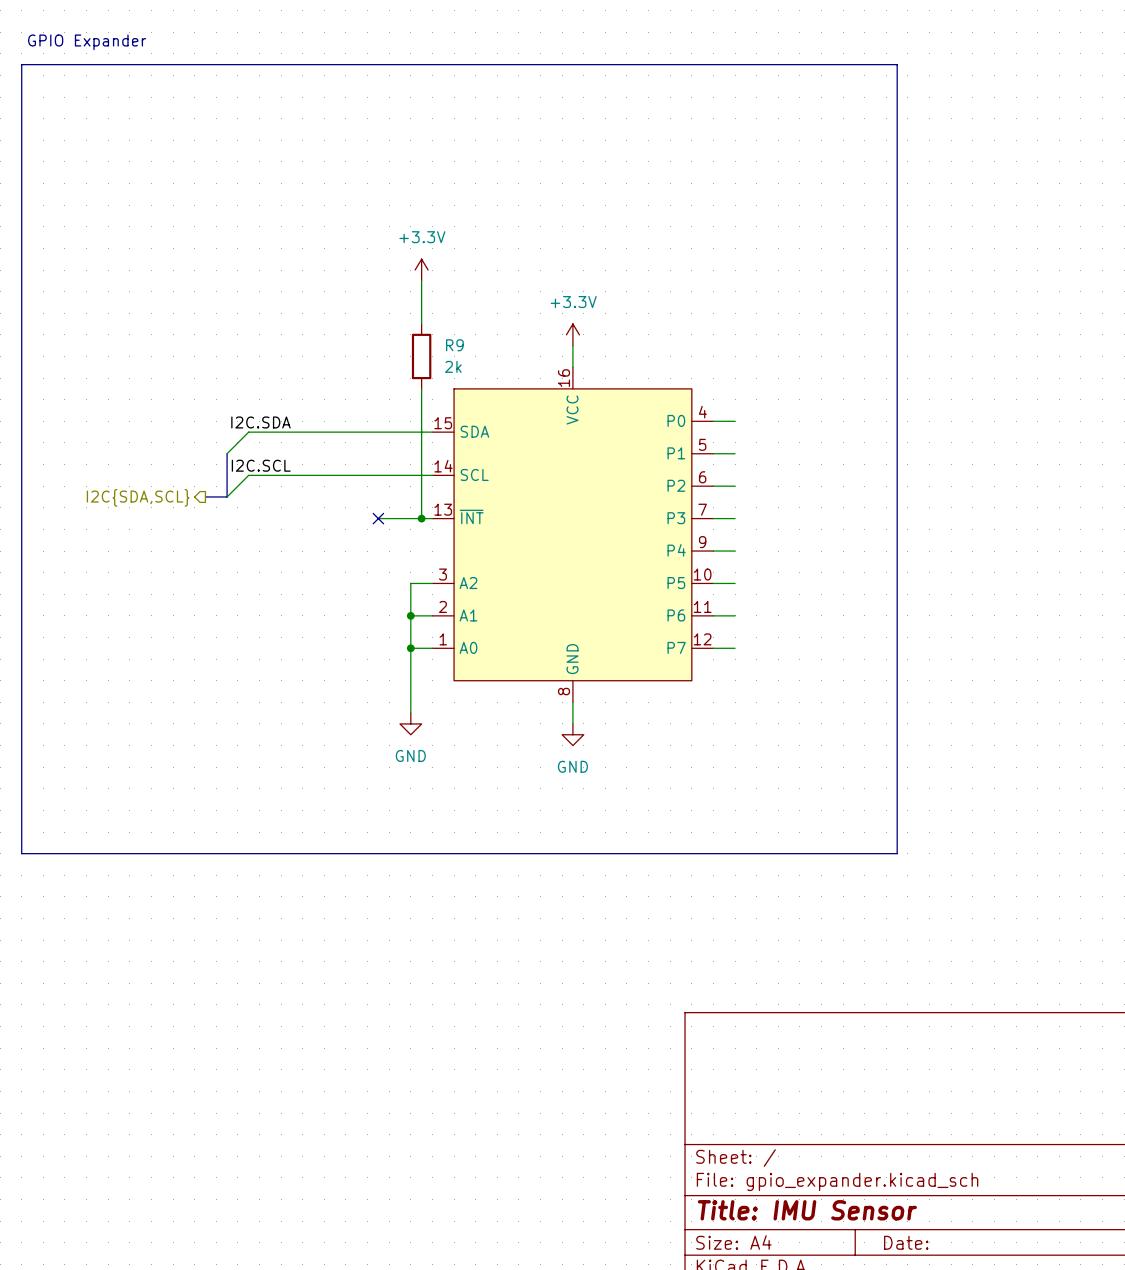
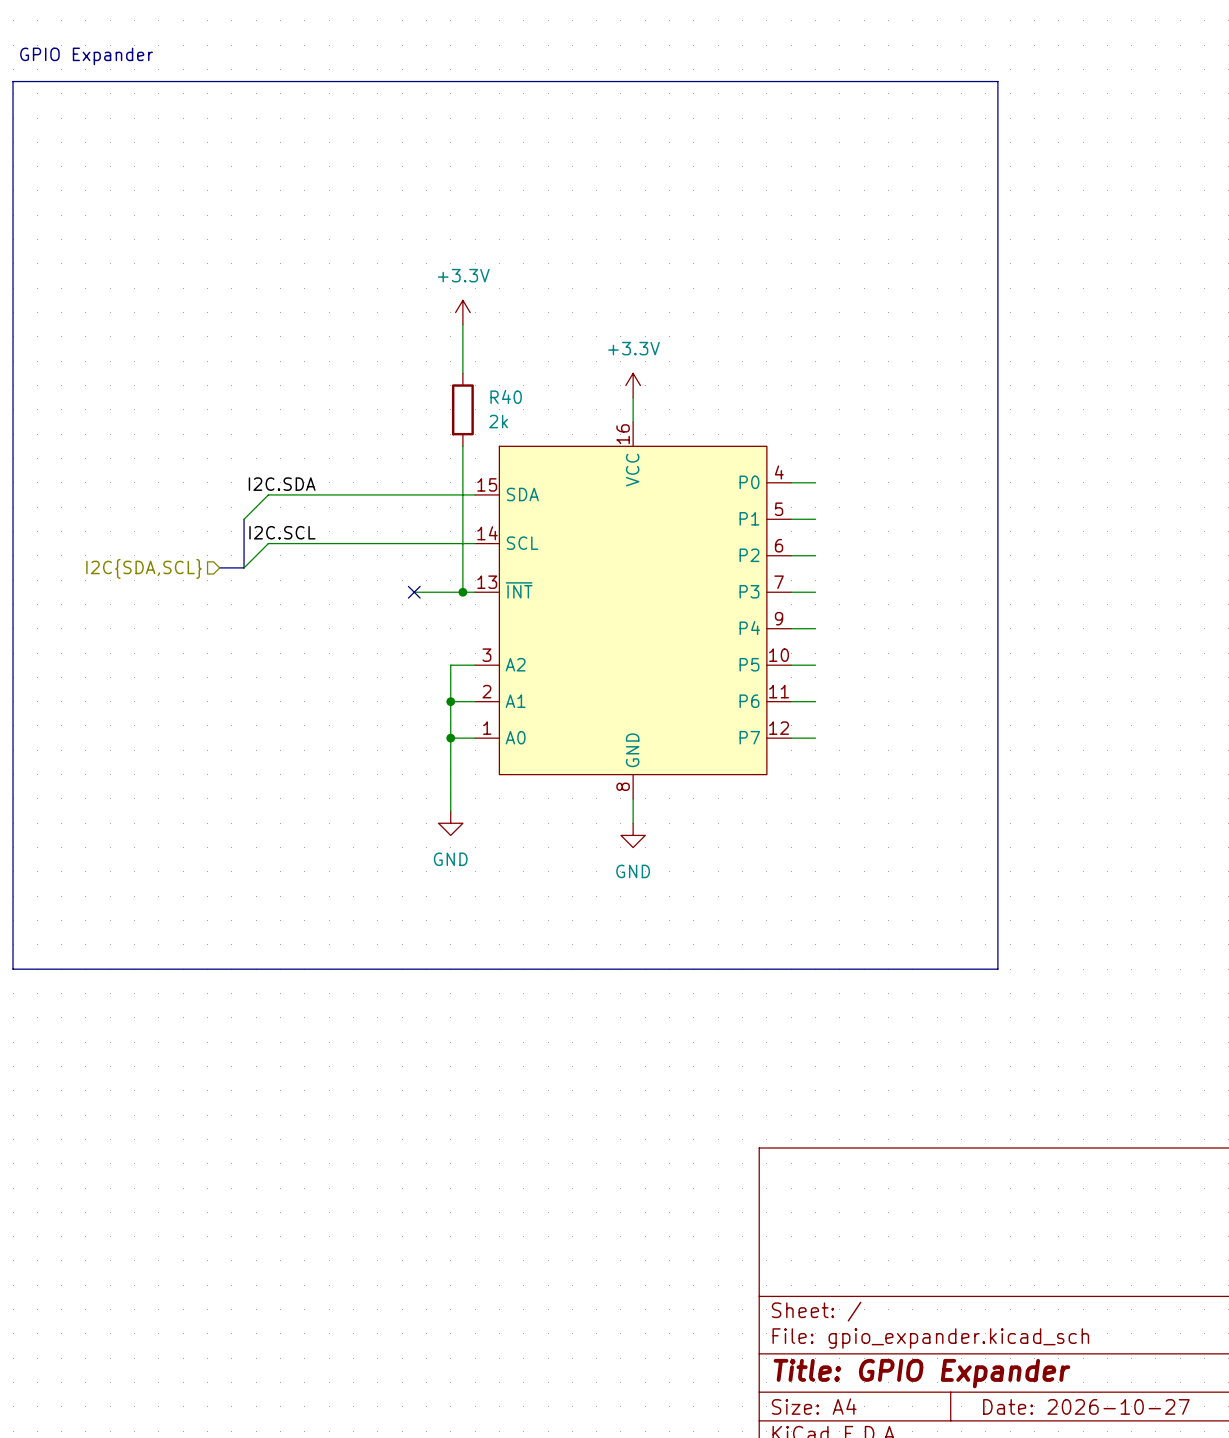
R9 name: R9 (454, 345) -> R40 (506, 396)
hierarchical label shape: output (138, 497) -> input (143, 568)
title block: Title: IMU Sensor (807, 1210) -> Title: GPIO Expander (921, 1373)
title block: Date: (906, 1242) -> Date: 2026-10-27 (1086, 1406)

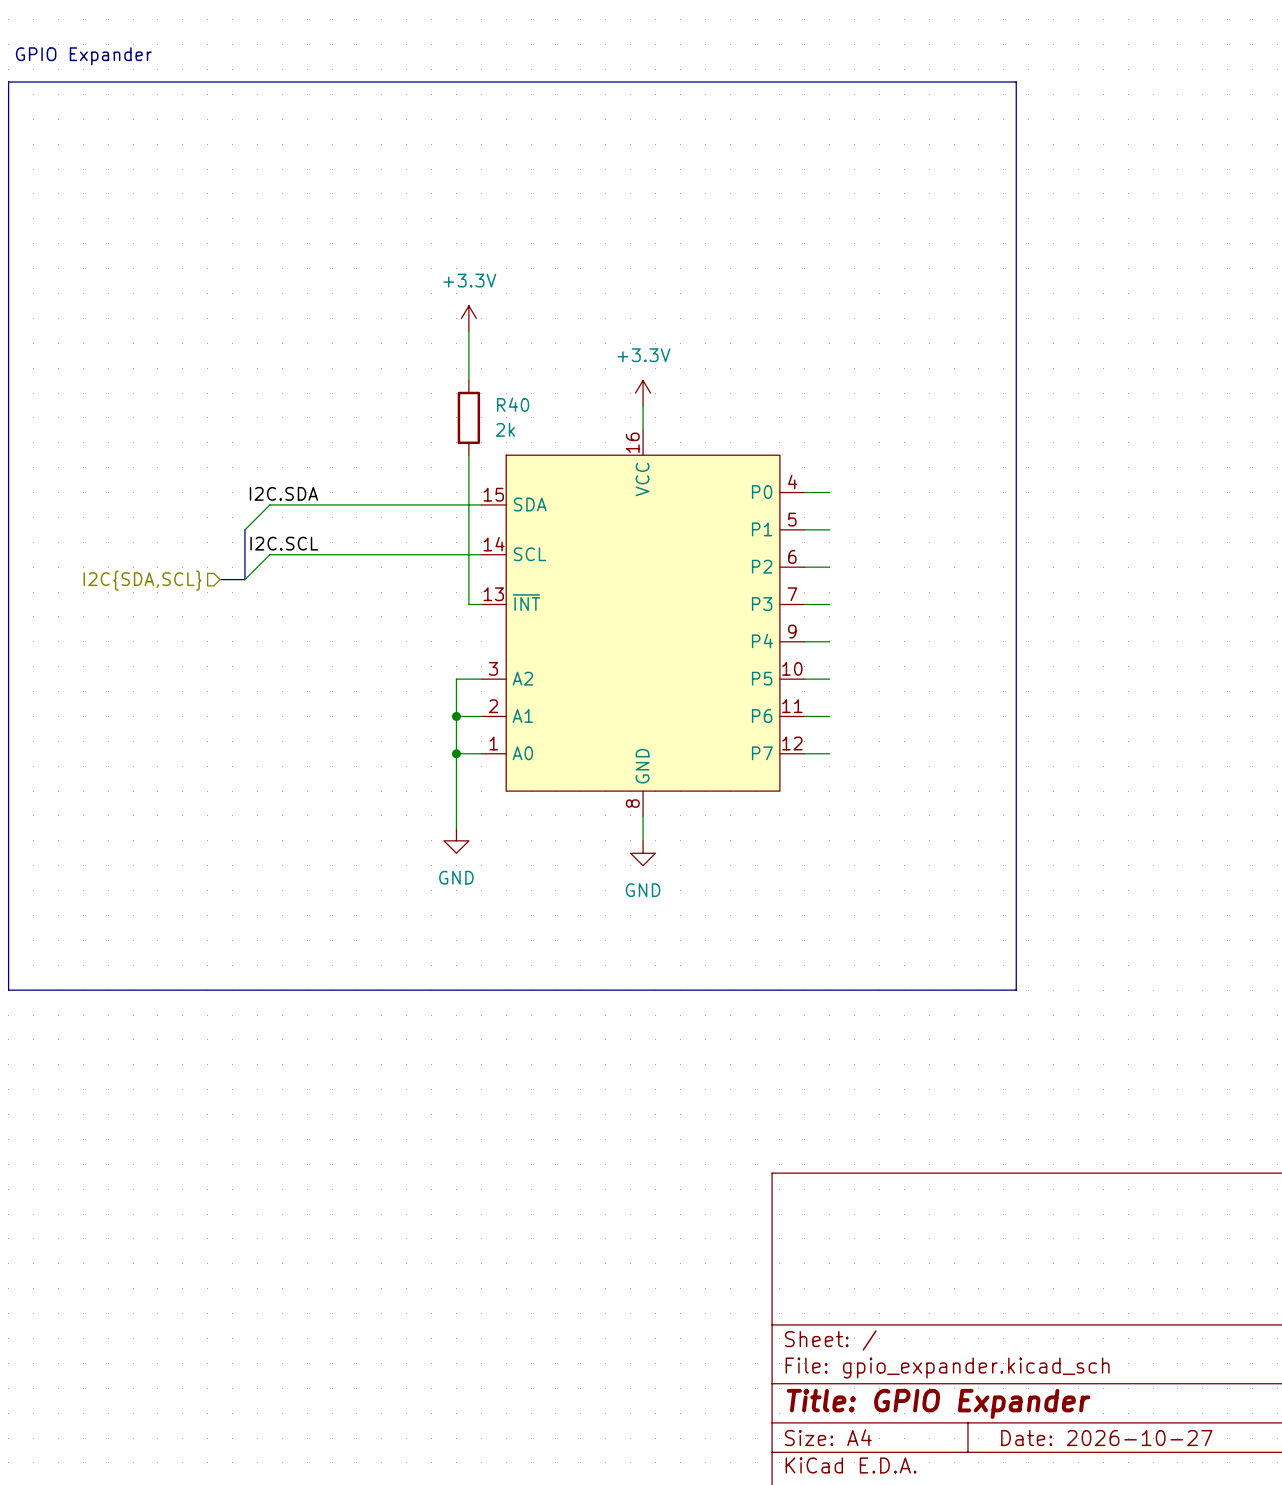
wire: (414, 592) (462, 592) -> none
no-connect mark: (414, 592) -> none
junction: (462, 592) -> none

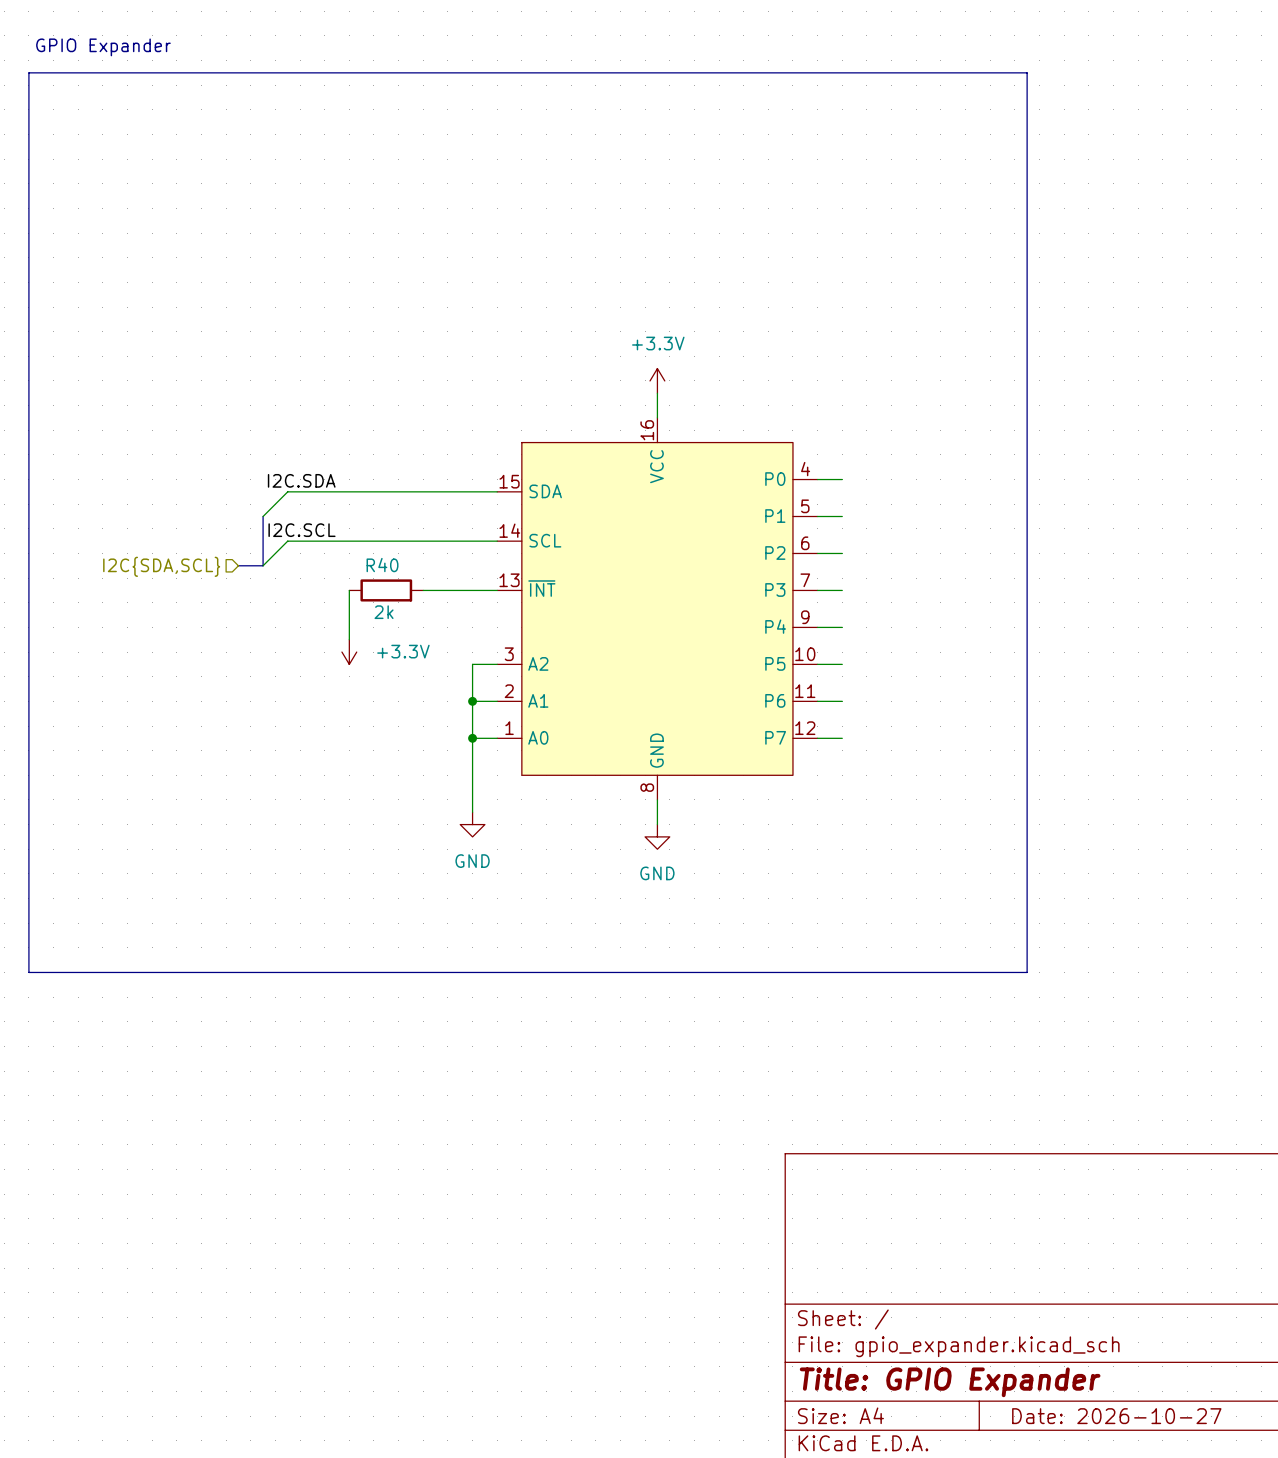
power symbol: +3.3V (468, 318) -> none
wire: (468, 330) (468, 380) -> none
R40 name position: R40 (513, 404) -> R40 (382, 565)
R40 rotation: 0° (468, 417) -> 90° clockwise (386, 590)
R40 position: (468, 417) -> (386, 590)
wire: (468, 455) (468, 604) -> (423, 590) (484, 590)
wire: none -> (349, 590) (349, 639)
power symbol: none -> +3.3V (349, 652)

